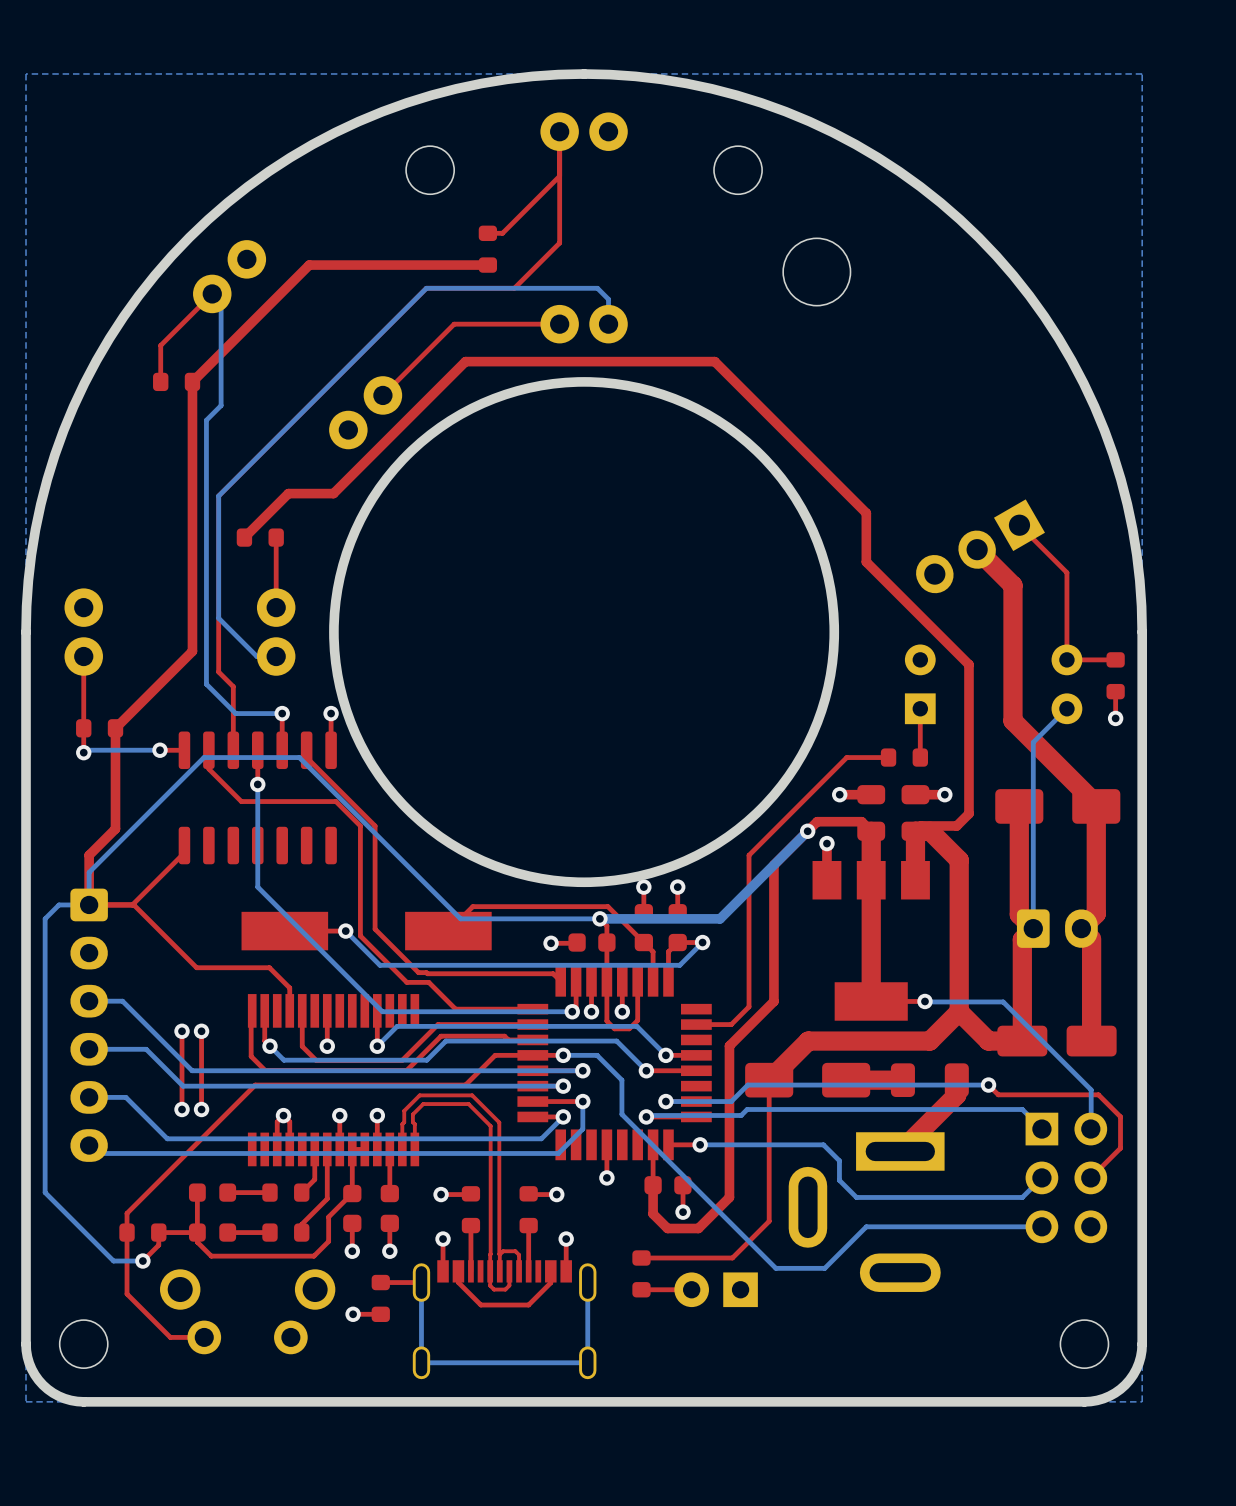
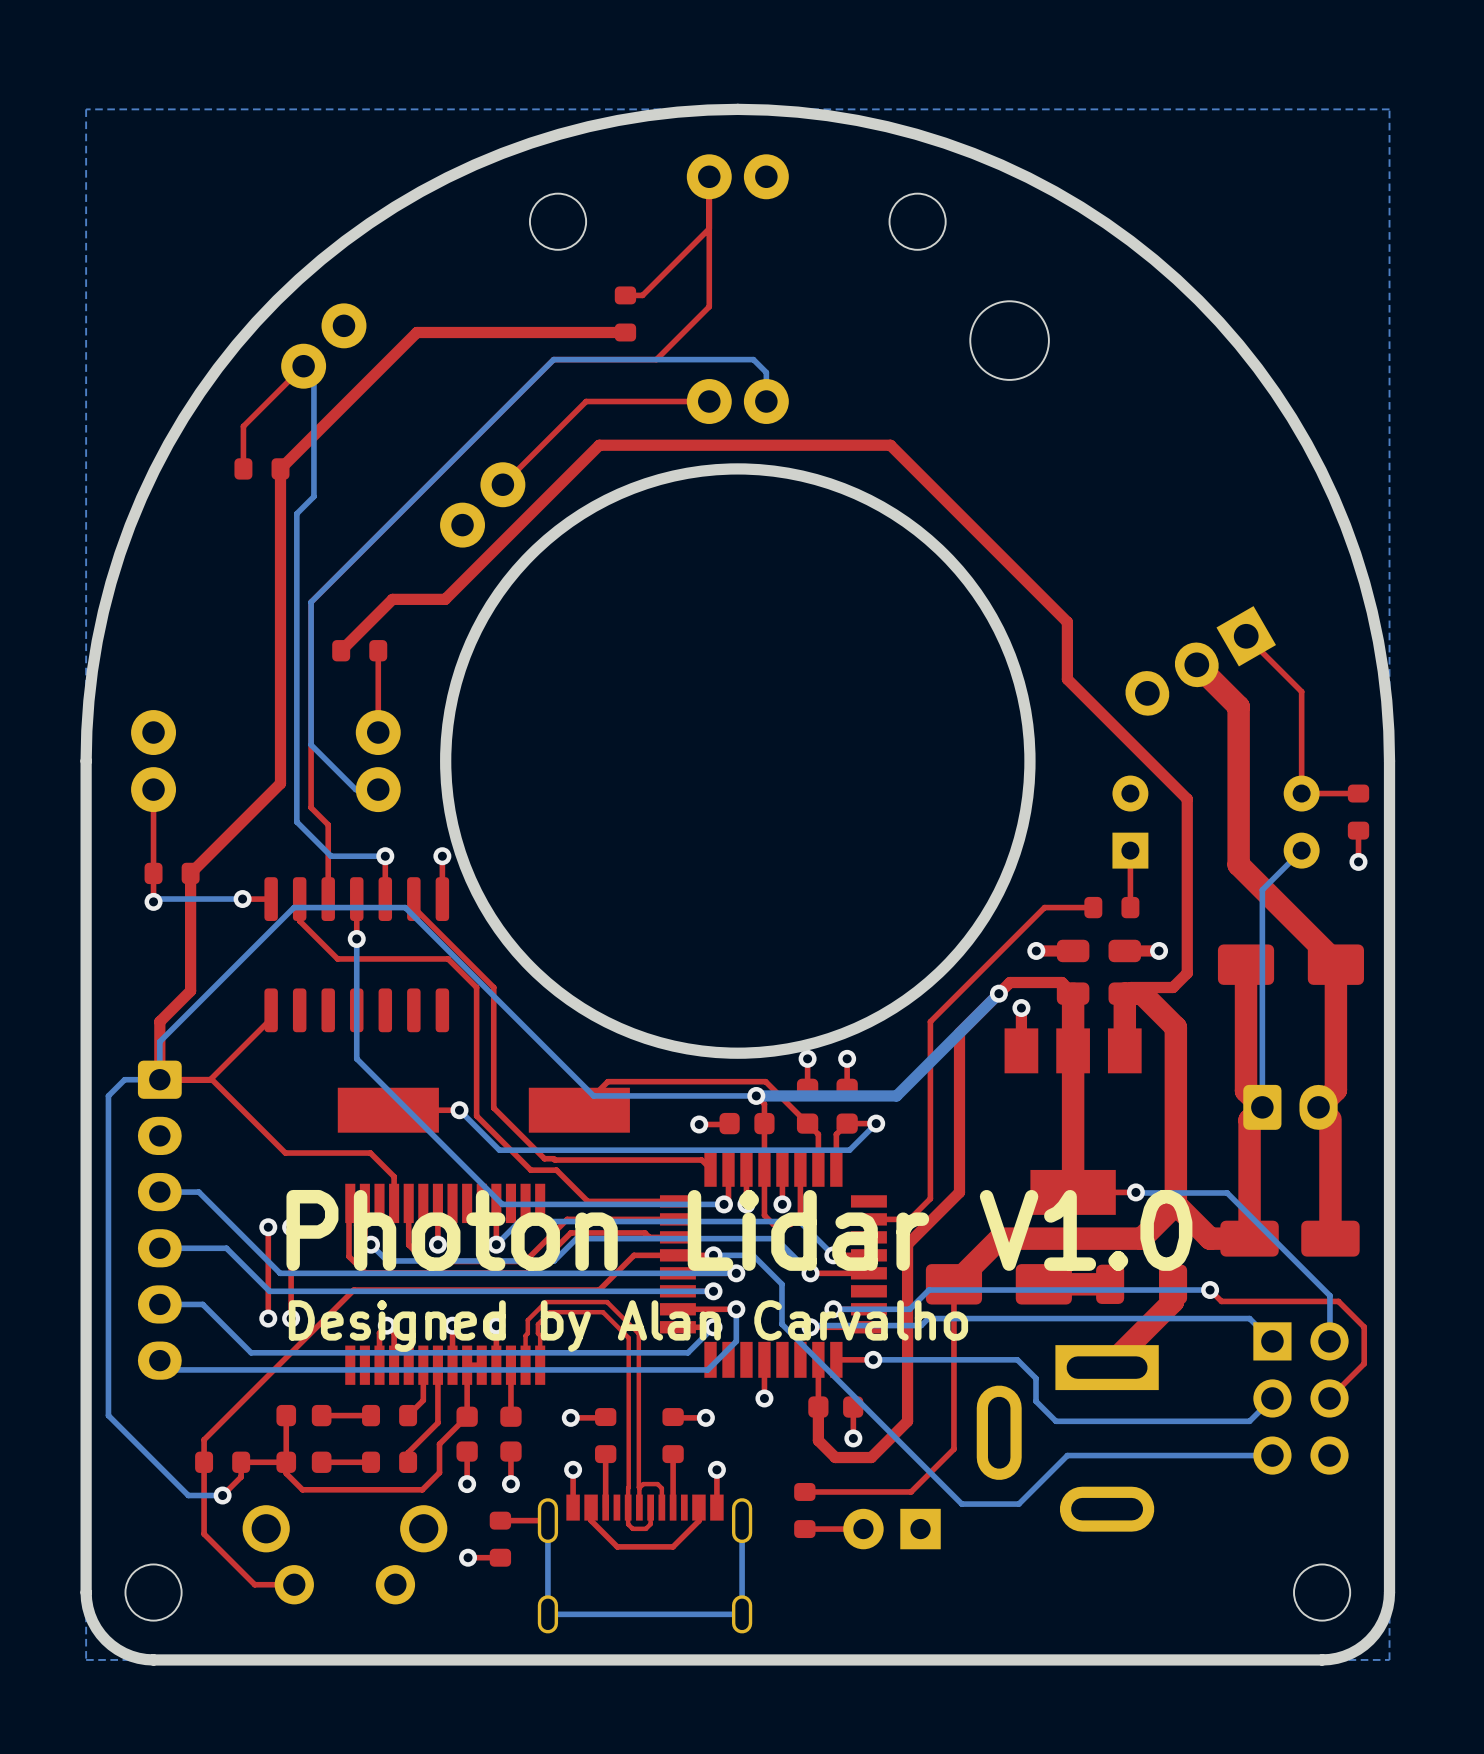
text: none -> Photon Lidar V1.0 (739, 1230)
text: none -> Designed by Alan Carvalho (628, 1326)

